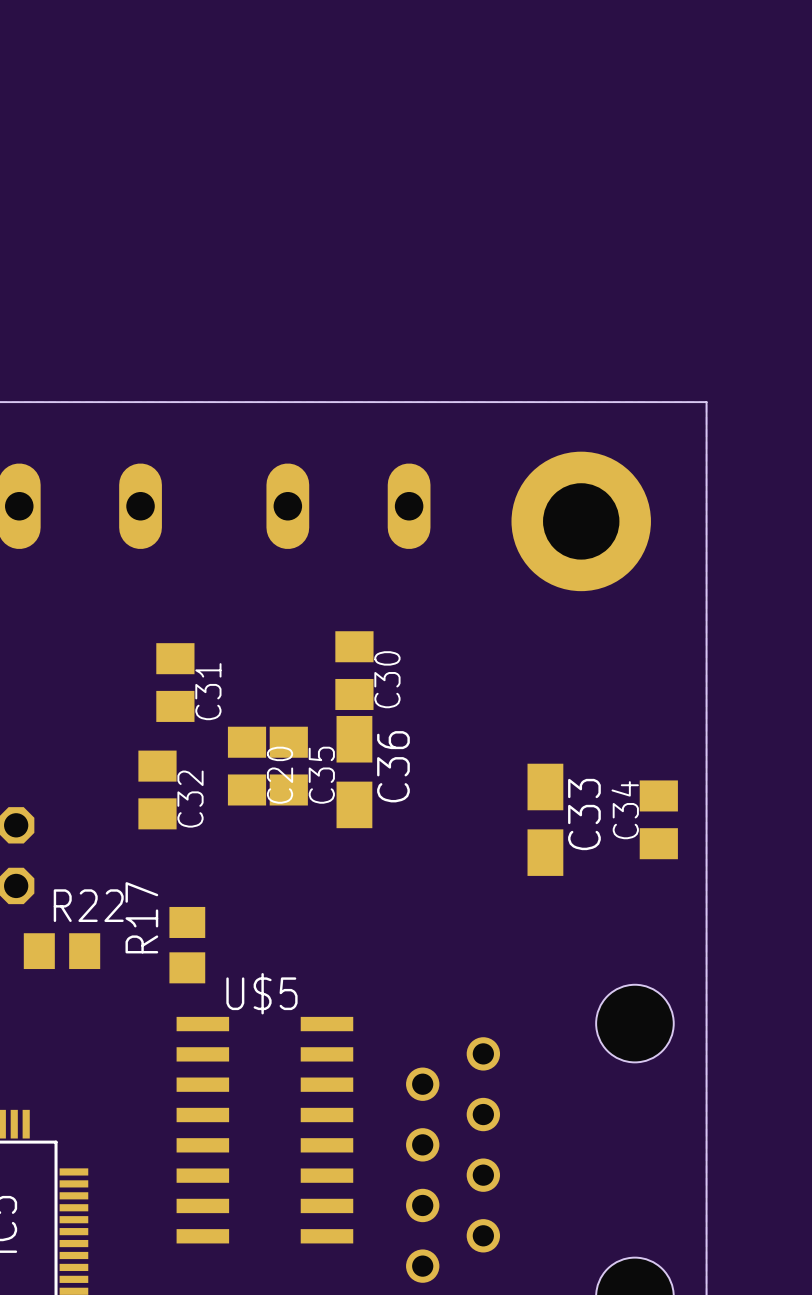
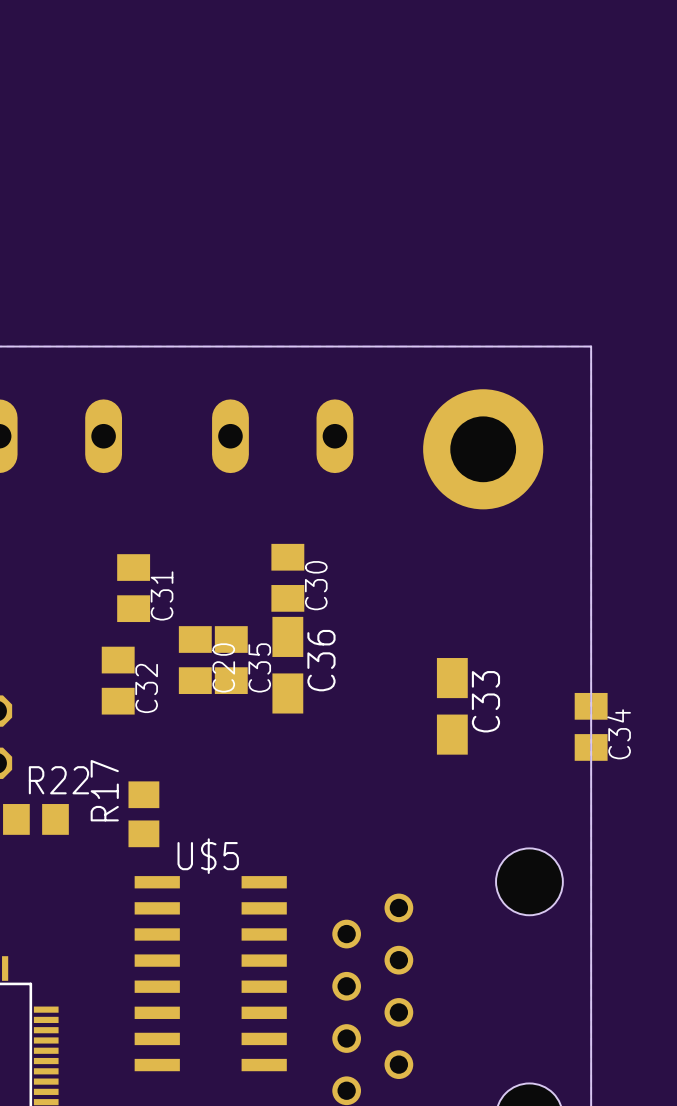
C34 name position: C34 (625, 810) -> C34 (619, 734)
C34 position: (658, 819) -> (591, 726)

